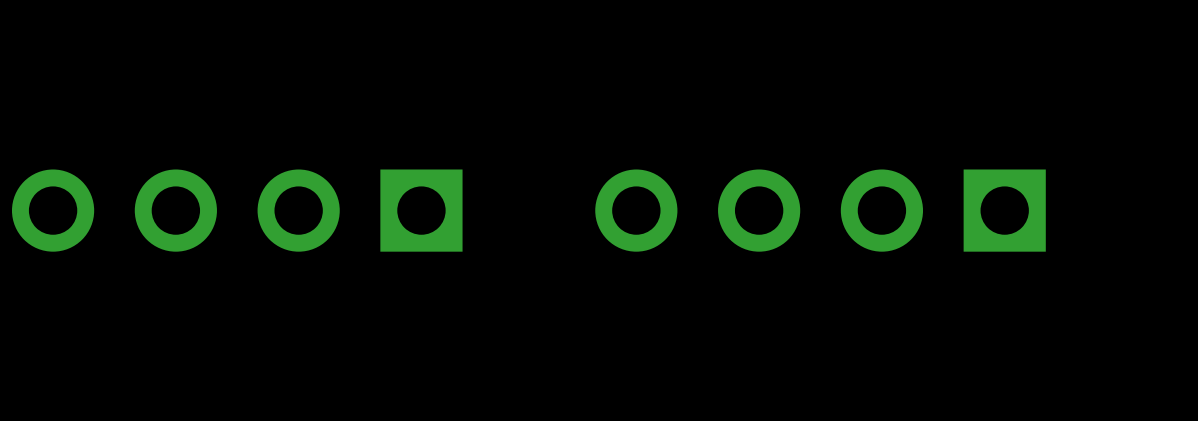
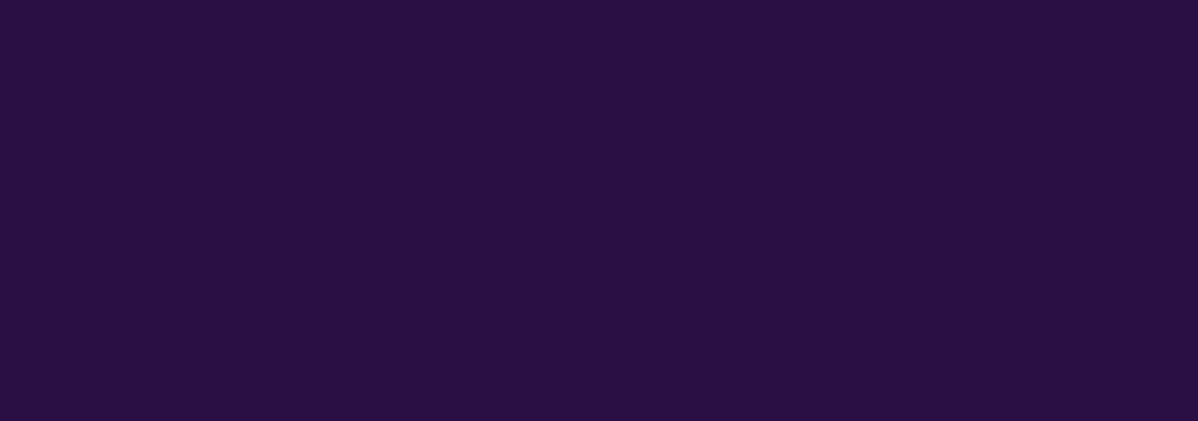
part: (237, 210) -> none
part: (820, 210) -> none

